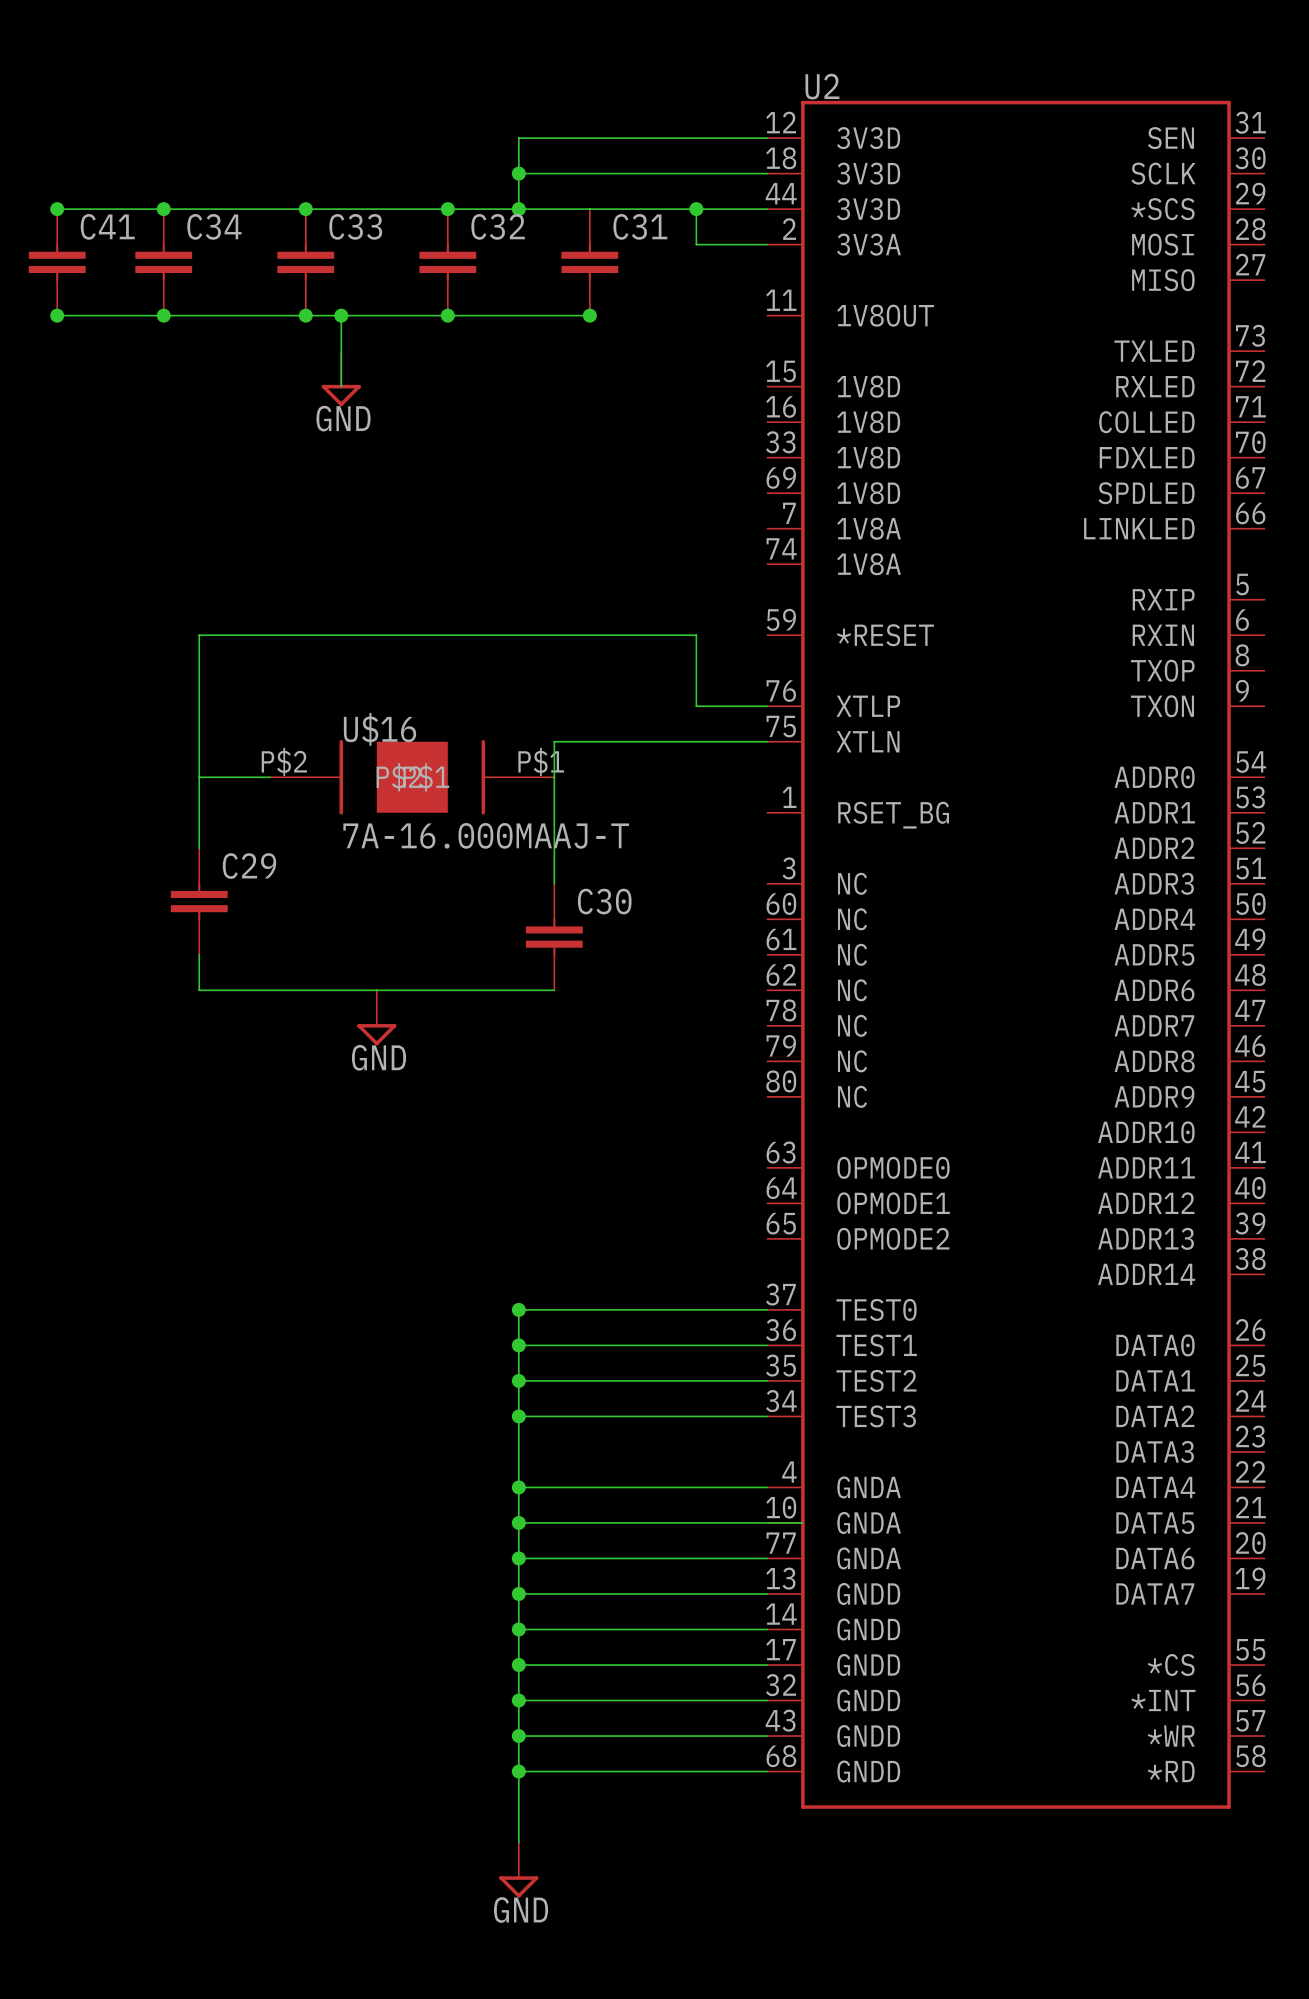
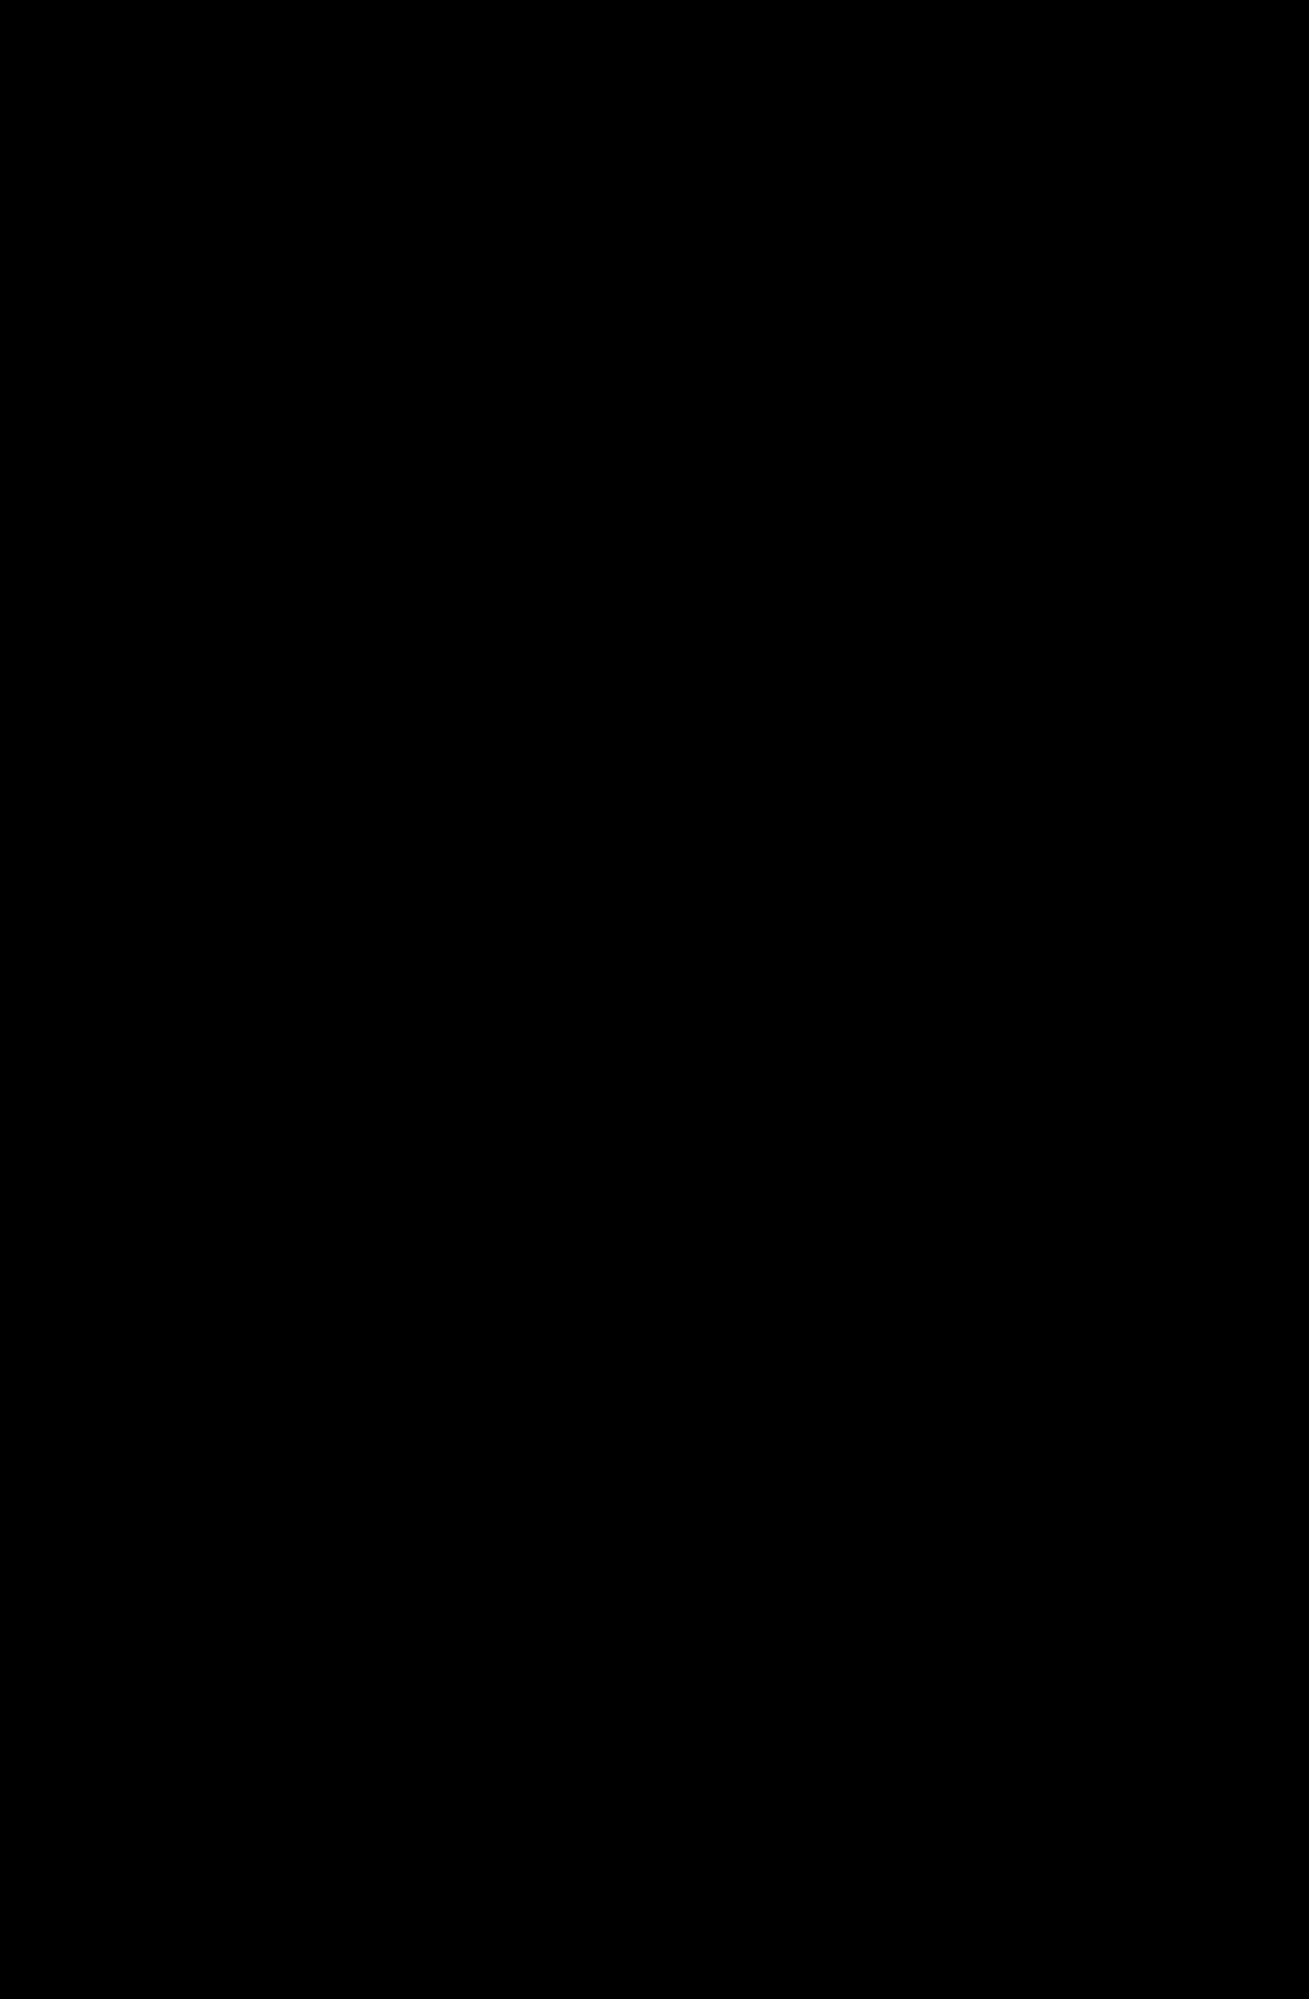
wire: (767, 138) (518, 138) (518, 209) -> none
wire: (518, 173) (767, 173) -> none
junction: (518, 173) -> none
wire: (57, 209) (767, 209) -> none
junction: (57, 209) -> none
junction: (163, 209) -> none
junction: (305, 209) -> none
junction: (447, 209) -> none
junction: (518, 209) -> none
wire: (696, 209) (696, 244) (767, 244) -> none
junction: (696, 209) -> none
C41: (57, 262) -> none
C34: (163, 262) -> none
C33: (305, 262) -> none
C32: (447, 262) -> none
C31: (589, 262) -> none
wire: (57, 315) (589, 315) -> none
junction: (57, 315) -> none
junction: (163, 315) -> none
junction: (305, 315) -> none
wire: (341, 315) (341, 386) -> none
junction: (341, 315) -> none
junction: (447, 315) -> none
junction: (589, 315) -> none
power symbol: GND (341, 378) -> none
wire: (767, 706) (696, 706) (696, 635) (199, 635) (199, 848) -> none
wire: (767, 741) (554, 741) (554, 883) -> none
wire: (199, 777) (270, 777) -> none
U$16: 7A-16.000MAAJ-T (412, 777) -> none
C29: (199, 901) -> none
C30: (554, 937) -> none
wire: (199, 954) (199, 990) (554, 990) -> none
U2: (1015, 954) -> none
power symbol: GND (376, 1017) -> none
junction: (518, 1309) -> none
wire: (767, 1309) (518, 1309) (518, 1842) -> none
wire: (518, 1345) (767, 1345) -> none
junction: (518, 1345) -> none
wire: (518, 1380) (767, 1380) -> none
junction: (518, 1380) -> none
wire: (518, 1416) (767, 1416) -> none
junction: (518, 1416) -> none
wire: (518, 1487) (767, 1487) -> none
junction: (518, 1487) -> none
wire: (518, 1522) (802, 1522) -> none
junction: (518, 1522) -> none
wire: (518, 1558) (767, 1558) -> none
junction: (518, 1558) -> none
wire: (518, 1593) (767, 1593) -> none
junction: (518, 1593) -> none
wire: (518, 1629) (767, 1629) -> none
junction: (518, 1629) -> none
wire: (518, 1665) (767, 1665) -> none
junction: (518, 1665) -> none
wire: (518, 1700) (767, 1700) -> none
junction: (518, 1700) -> none
wire: (518, 1736) (767, 1736) -> none
junction: (518, 1736) -> none
wire: (518, 1771) (767, 1771) -> none
junction: (518, 1771) -> none
power symbol: GND (518, 1870) -> none

